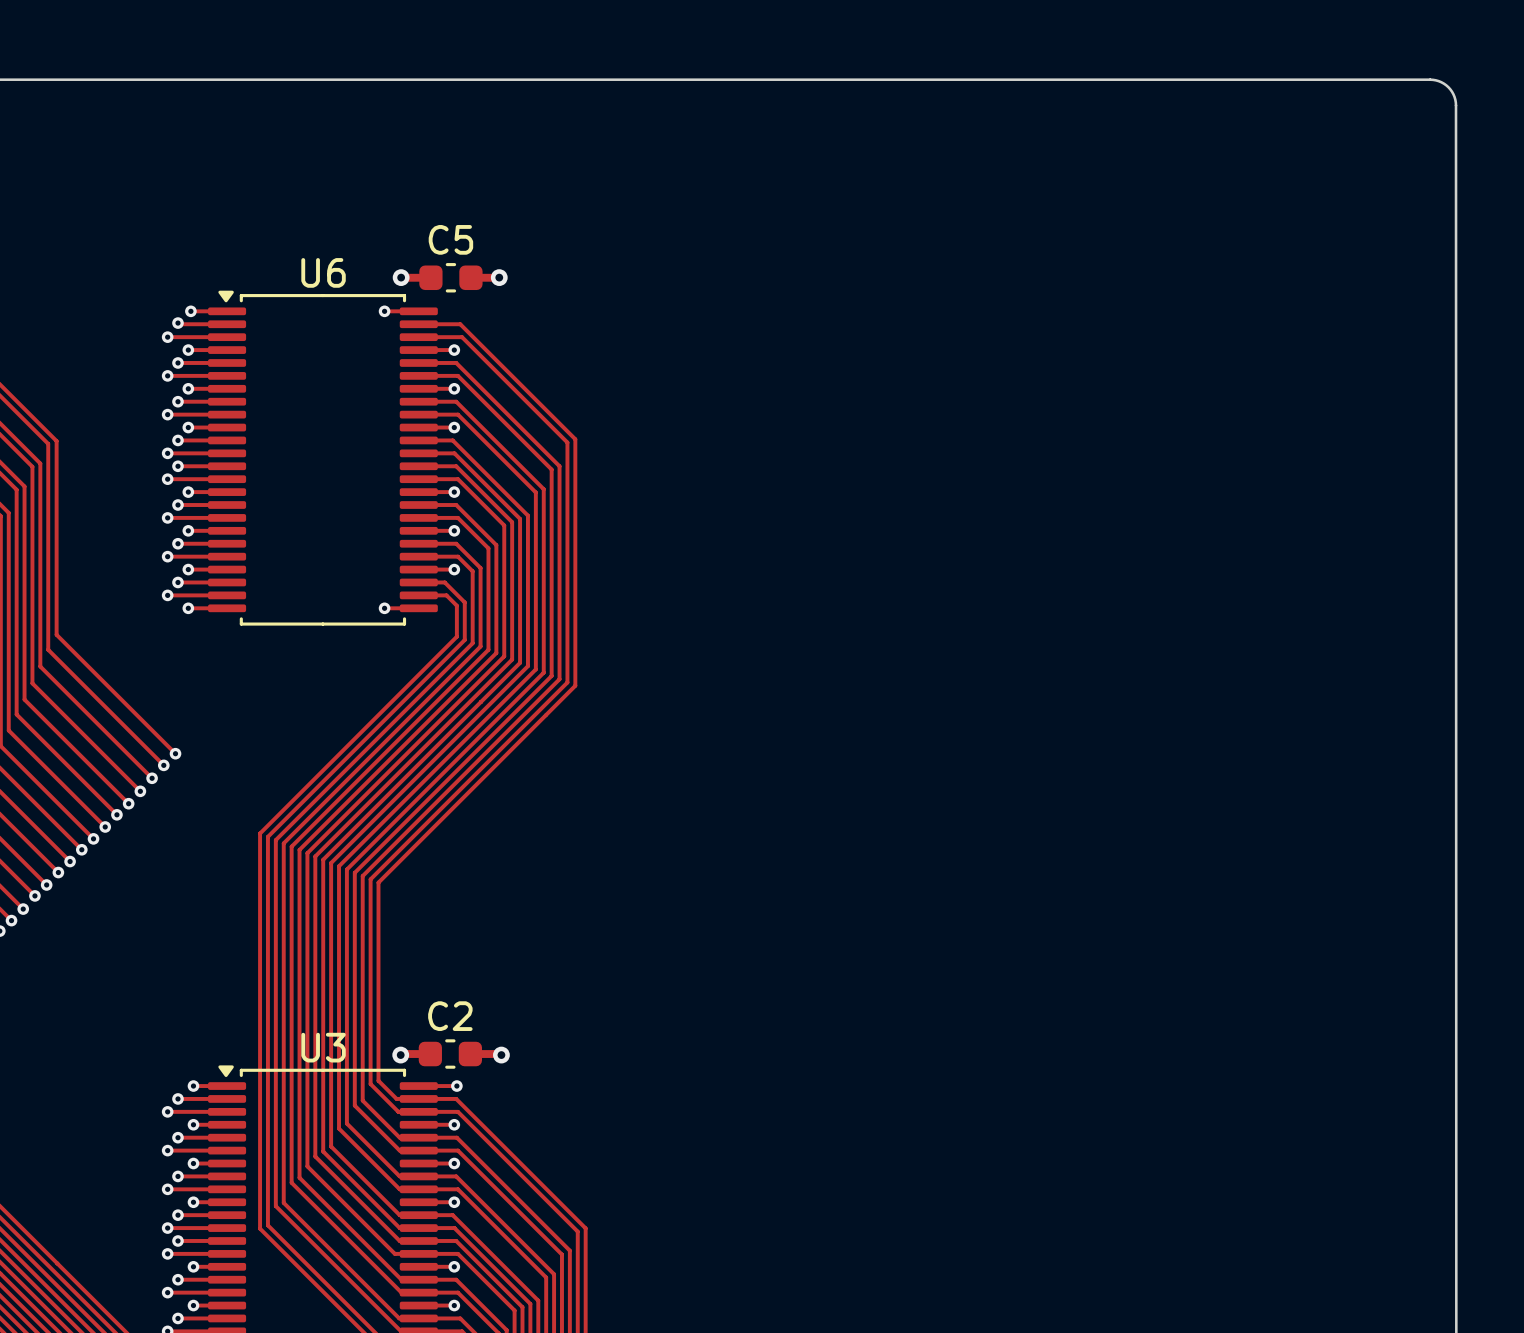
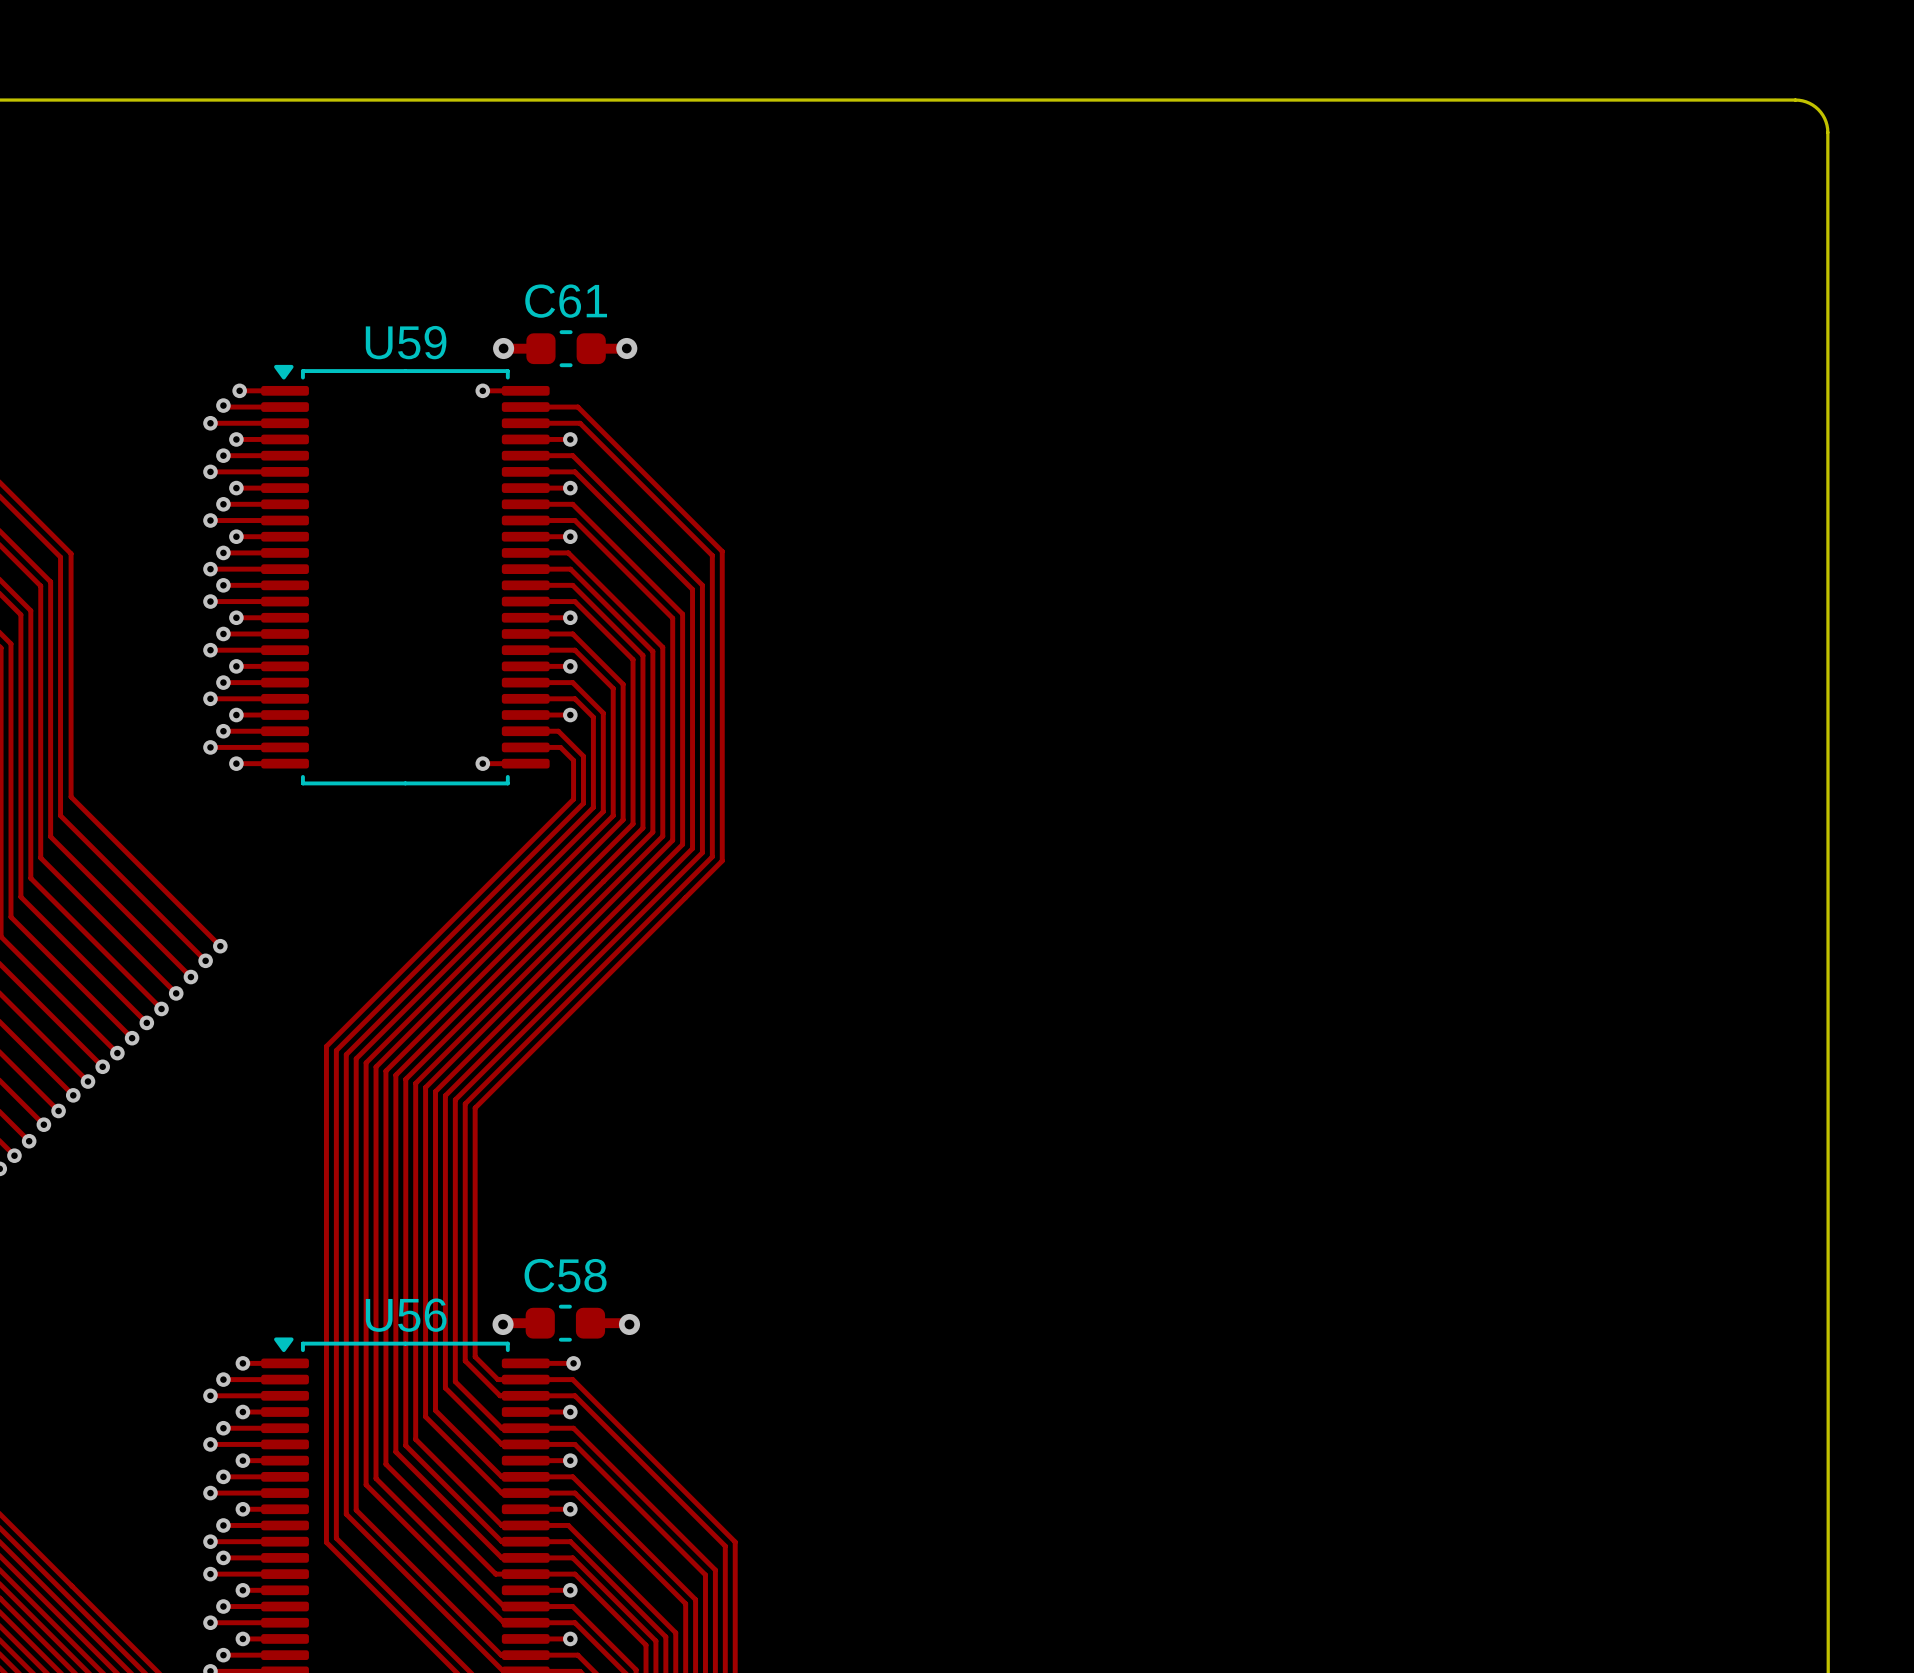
C5 name: C5 (450, 239) -> C61 (566, 301)
U6 name: U6 (323, 272) -> U59 (406, 342)
C2 name: C2 (450, 1016) -> C58 (565, 1275)
U3 name: U3 (323, 1047) -> U56 (406, 1315)

